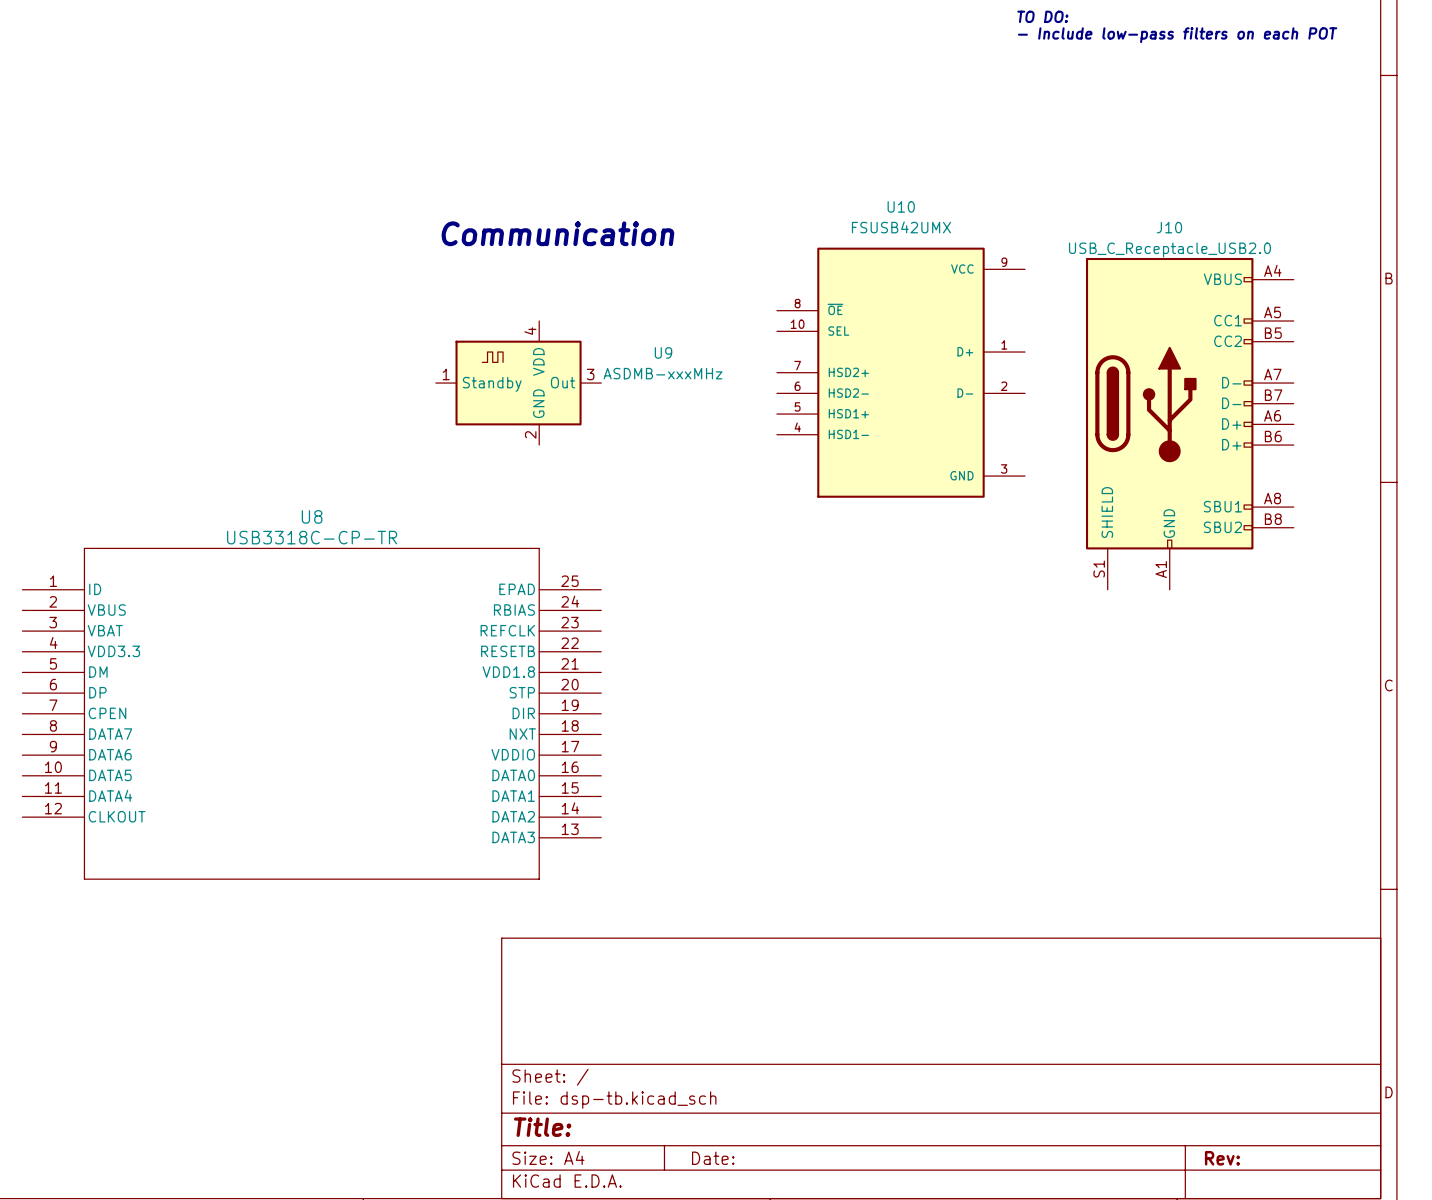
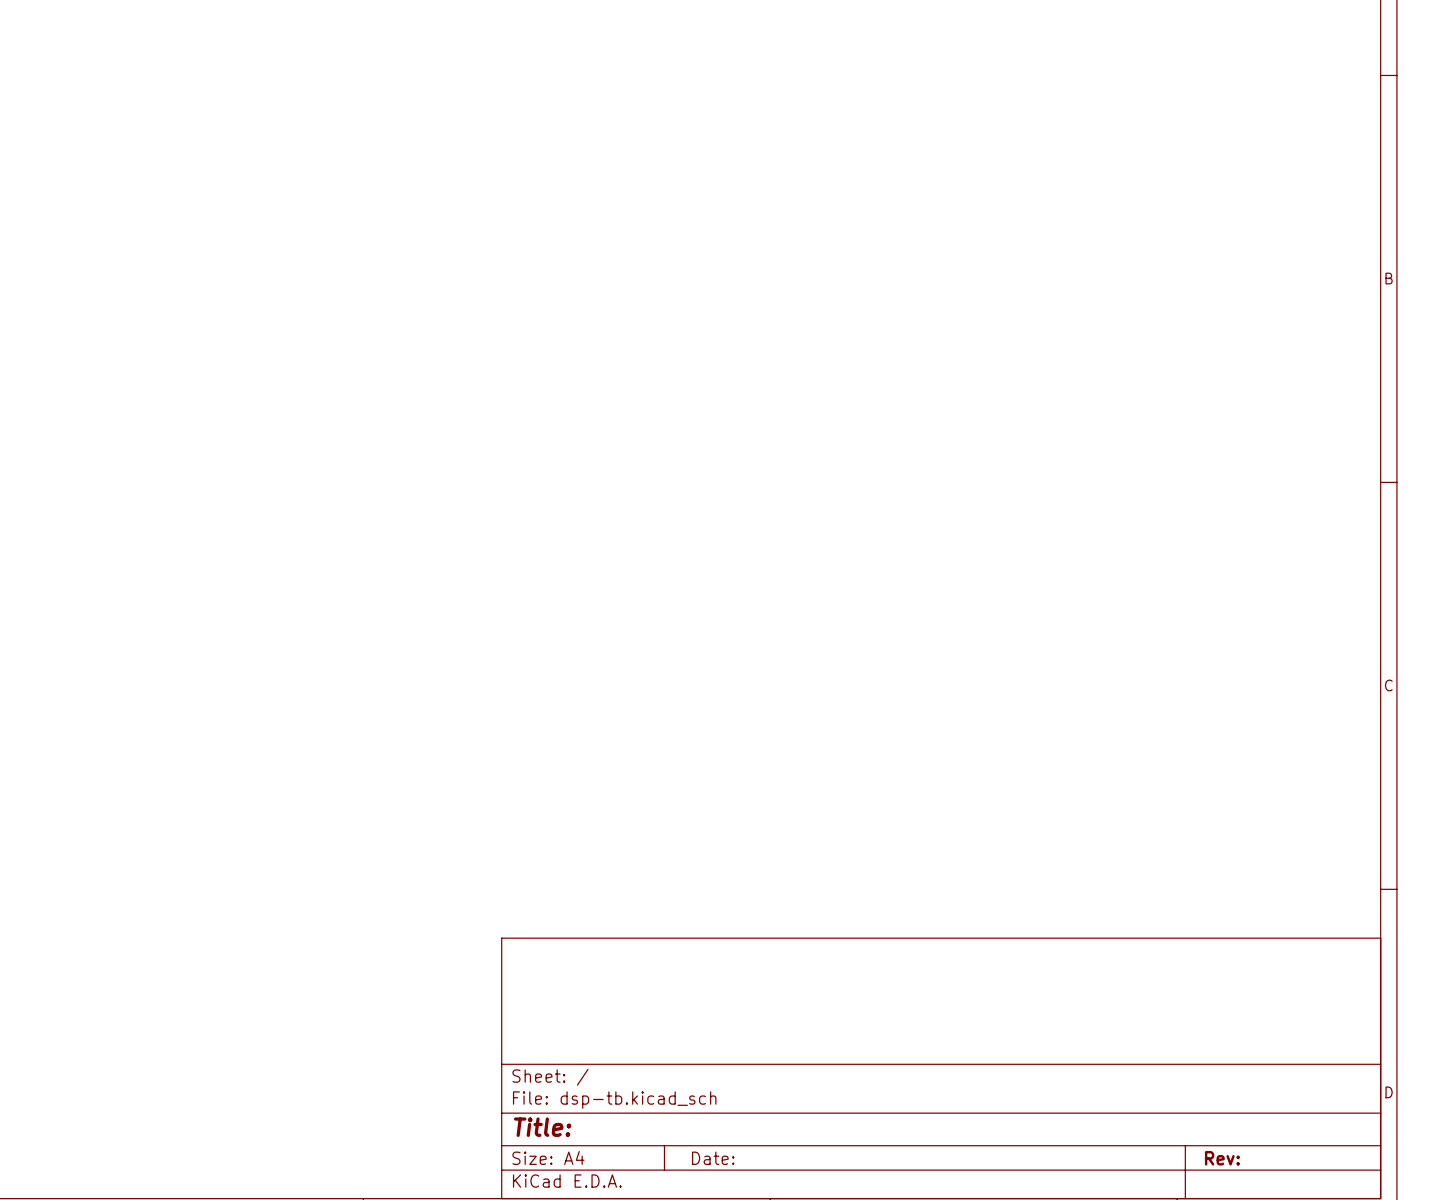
text: TO DO: (1042, 16) -> none
text: - Include low-pass filters on each POT (1177, 35) -> none
text: Communication (557, 233) -> none
U10: FSUSB42UMX (900, 372) -> none
U9: ASDMB-xxxMHz (518, 383) -> none
J10: USB_C_Receptacle_USB2.0 (1189, 423) -> none
U8: USB3318C-CP-TR (311, 713) -> none

